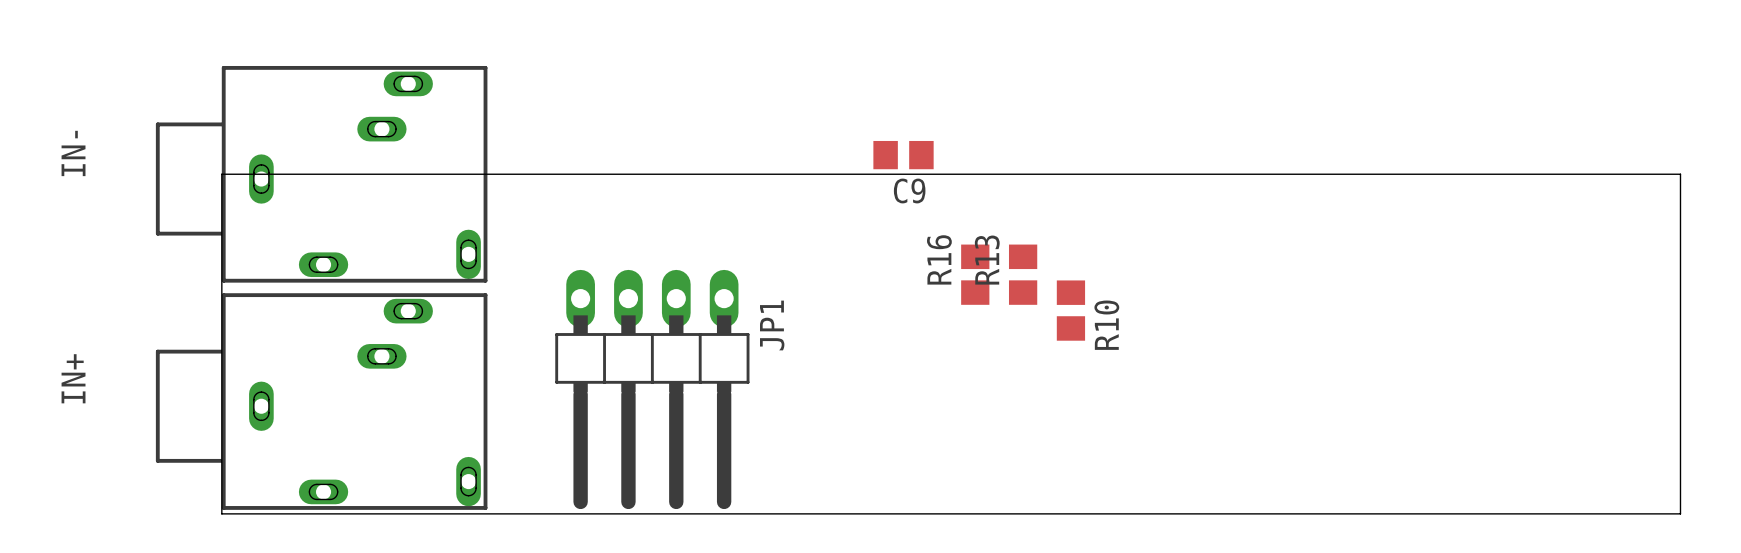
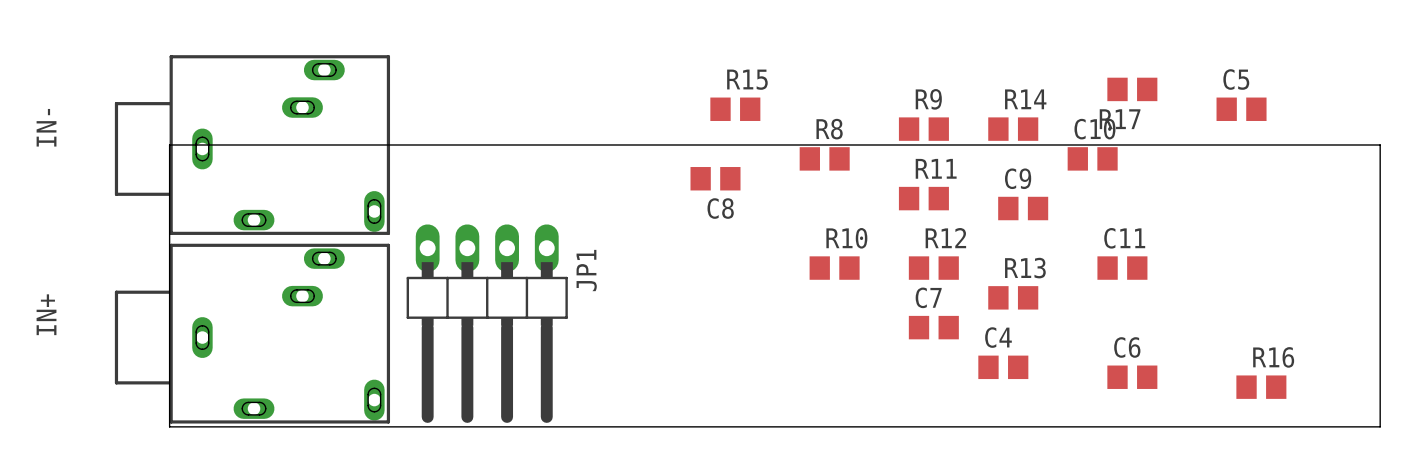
R17: none -> (1132, 89)
R15: none -> (735, 109)
C5: none -> (1241, 109)
C9 position: (903, 155) -> (1023, 208)
R9: none -> (923, 129)
R14: none -> (1013, 129)
R8: none -> (824, 158)
C10: none -> (1092, 158)
C9 name position: C9 (909, 191) -> C9 (1018, 178)
C8: none -> (715, 178)
R11: none -> (923, 198)
R16 rotation: 0° (975, 274) -> 90° clockwise (1261, 387)
R16 position: (975, 274) -> (1261, 387)
R13 rotation: 0° (1023, 274) -> 90° clockwise (1013, 297)
R13 position: (1023, 274) -> (1013, 297)
R10 rotation: 0° (1070, 310) -> 90° clockwise (834, 268)
R10 position: (1070, 310) -> (834, 268)
R12: none -> (933, 268)
C11: none -> (1122, 268)
R10 name position: R10 (1106, 325) -> R10 (846, 238)
JP1 position: (652, 389) -> (487, 323)
C7: none -> (933, 327)
C4: none -> (1003, 367)
C6: none -> (1132, 377)

